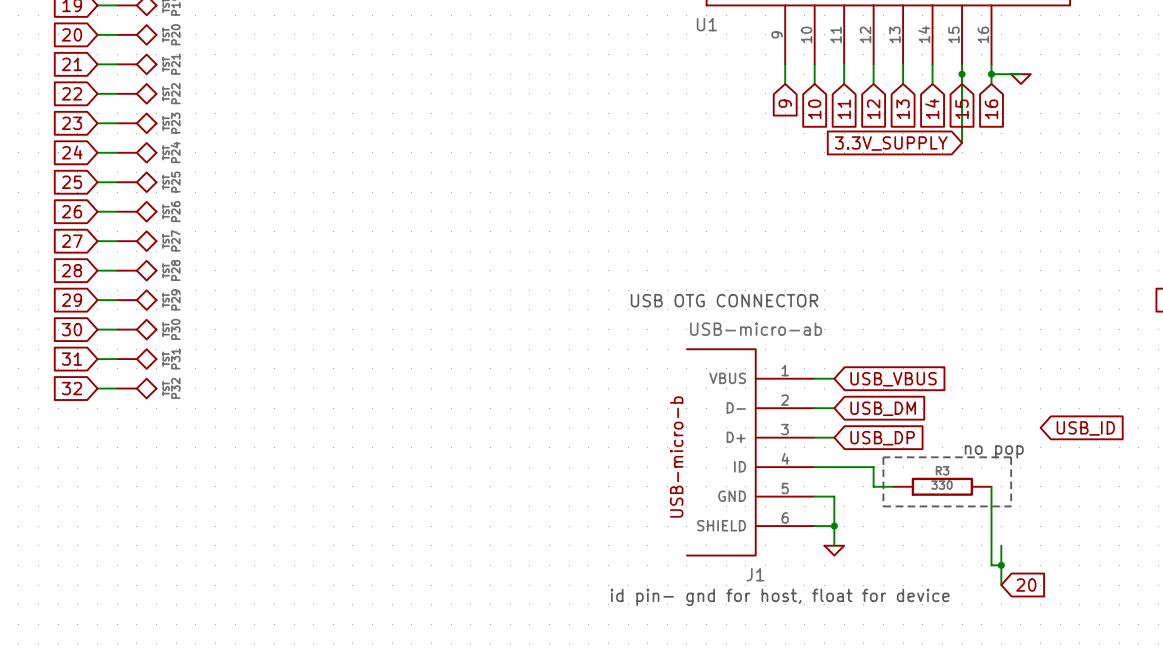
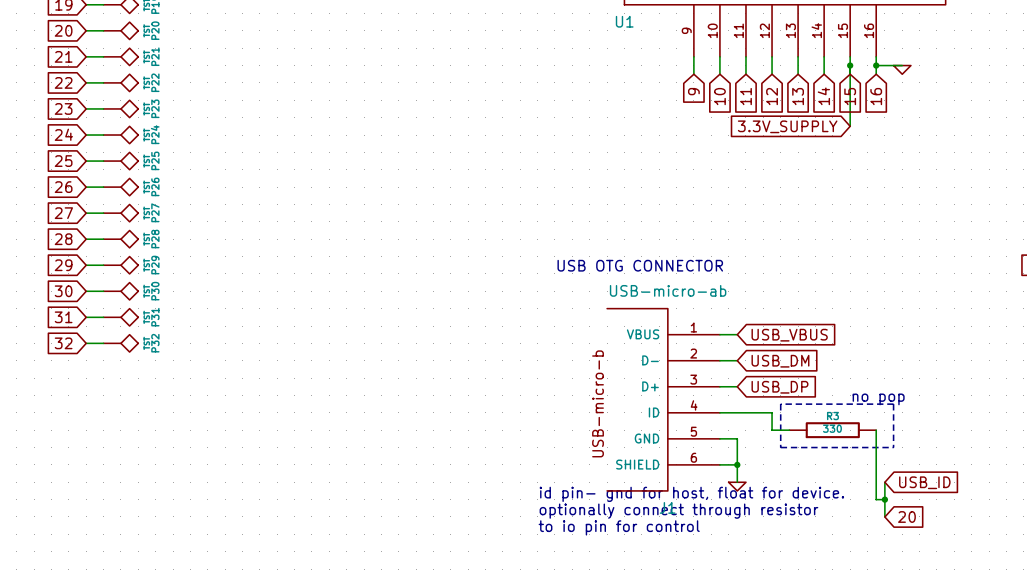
global label position: USB_ID (1085, 428) -> USB_ID (924, 482)
text: none -> id pin- gnd for host, float for device. (691, 494)
text: none -> optionally connect through resistor (678, 511)
text: id pin- gnd for host, float for device (780, 597) -> to io pin for control (619, 527)

